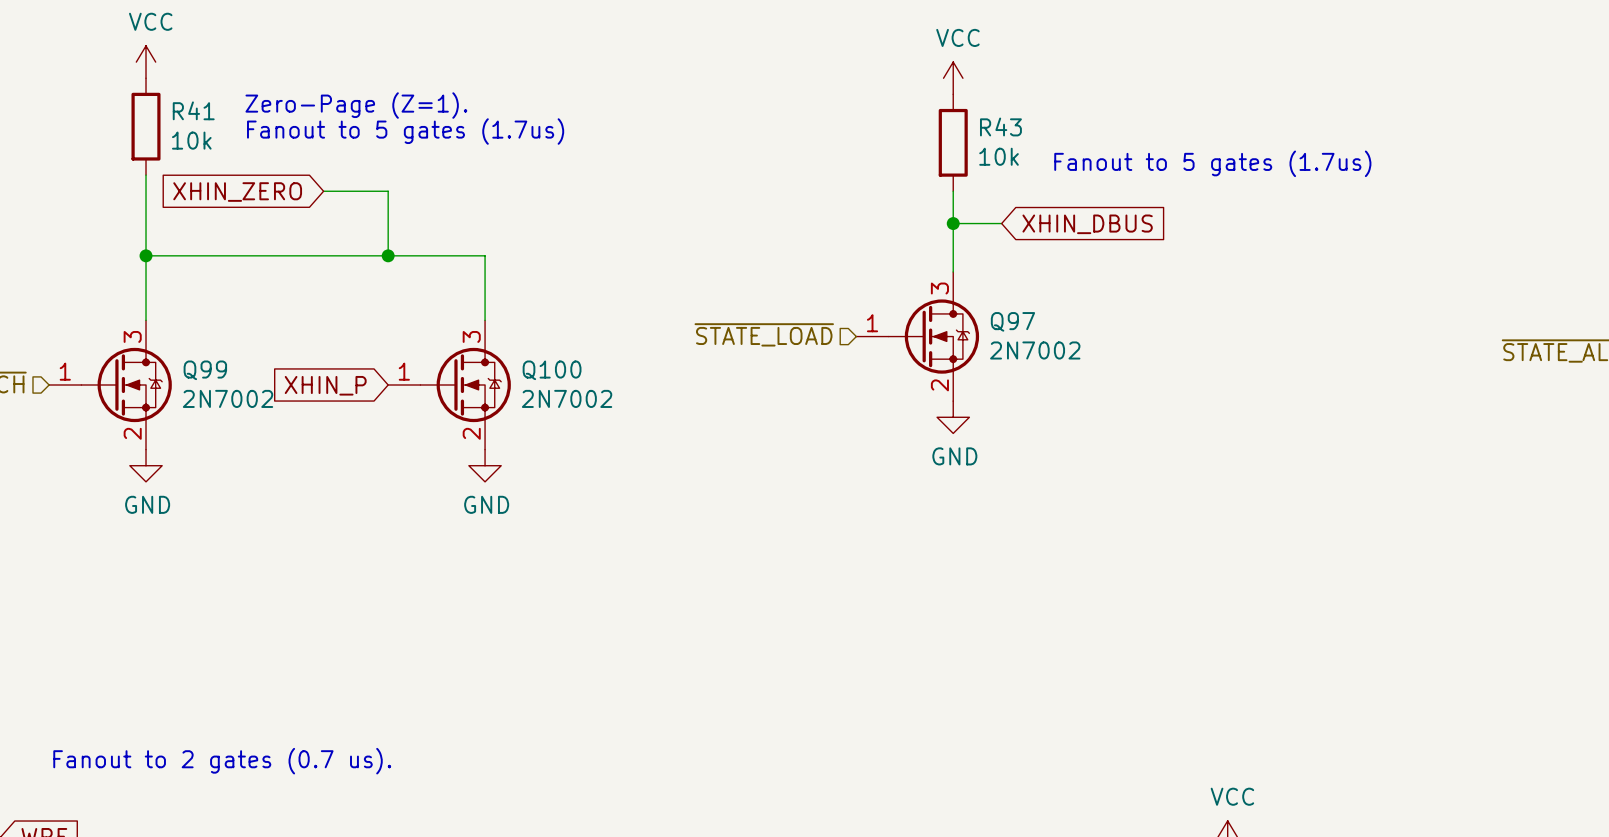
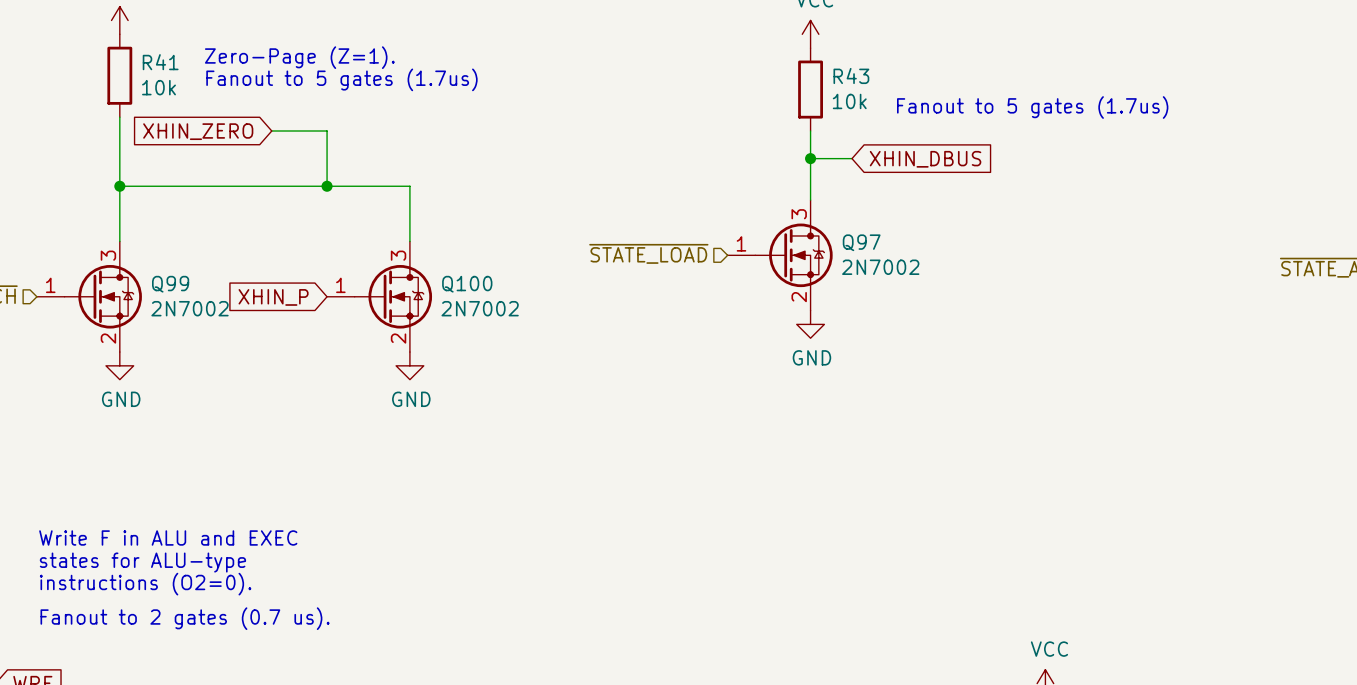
text: none -> Write F in ALU and EXEC (168, 537)
text: none -> states for ALU-type (142, 562)
text: none -> instructions (O2=0). (145, 584)

